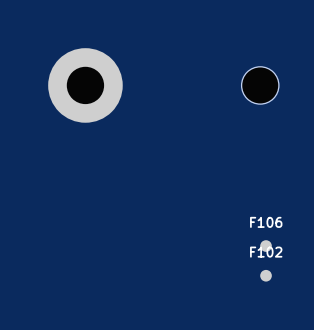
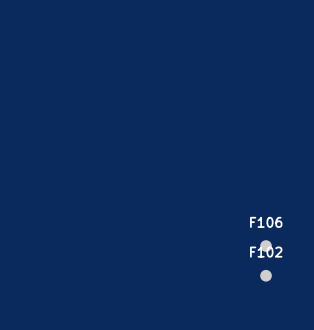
part: (85, 85) -> none
part: (260, 85) -> none

